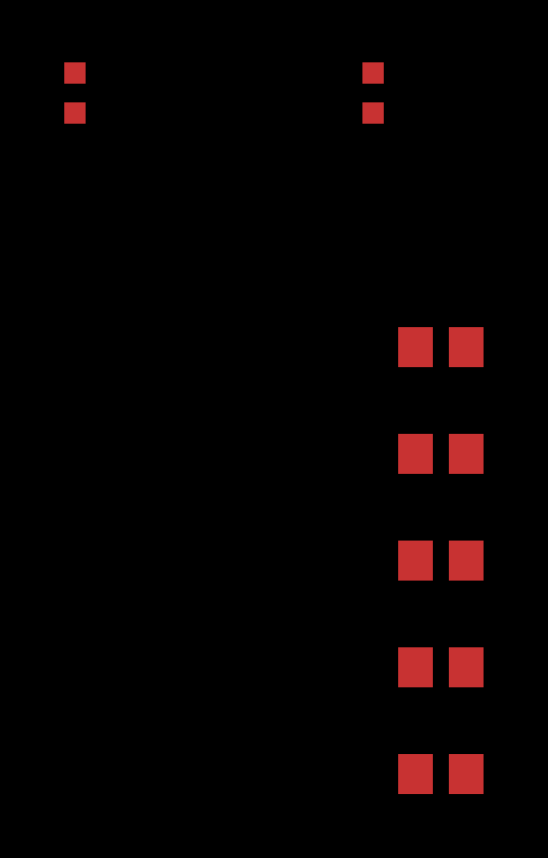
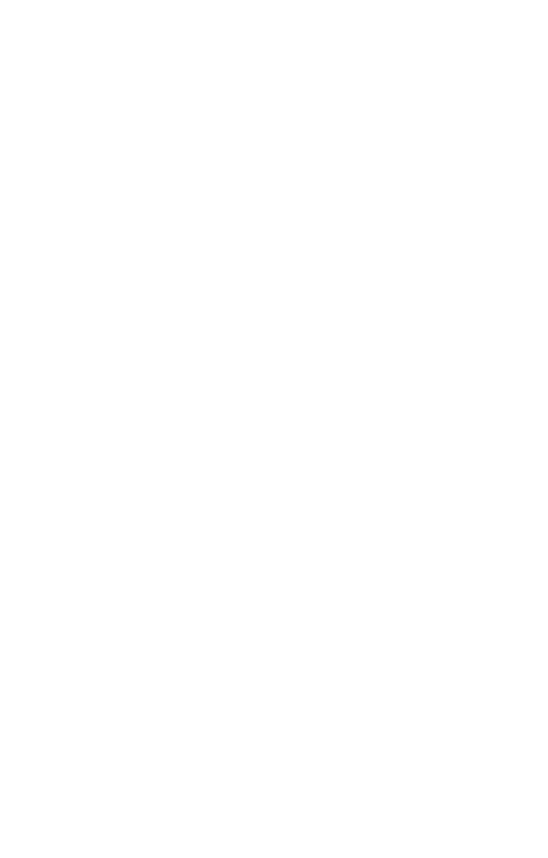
part: (74, 93) -> none
part: (373, 93) -> none
part: (440, 347) -> none
part: (440, 453) -> none
part: (440, 560) -> none
part: (440, 667) -> none
part: (440, 774) -> none

